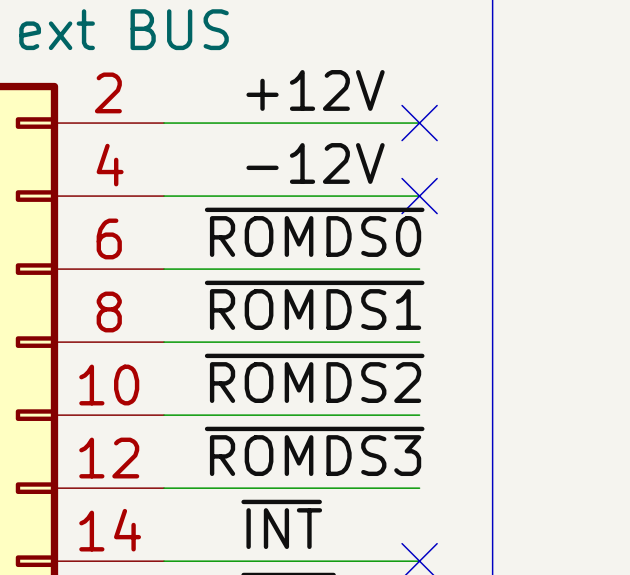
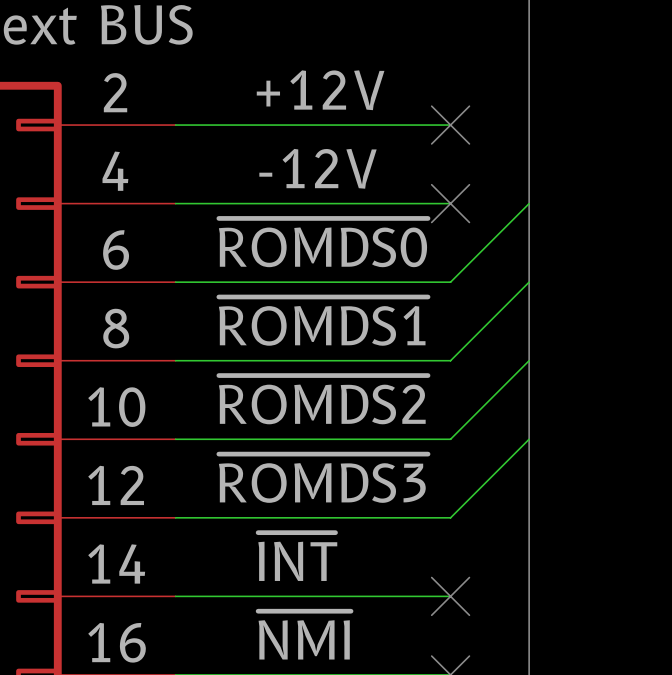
wire: none -> (529, 203) (450, 282)
wire: none -> (529, 282) (450, 360)
wire: none -> (529, 360) (450, 439)
wire: none -> (529, 439) (450, 517)

